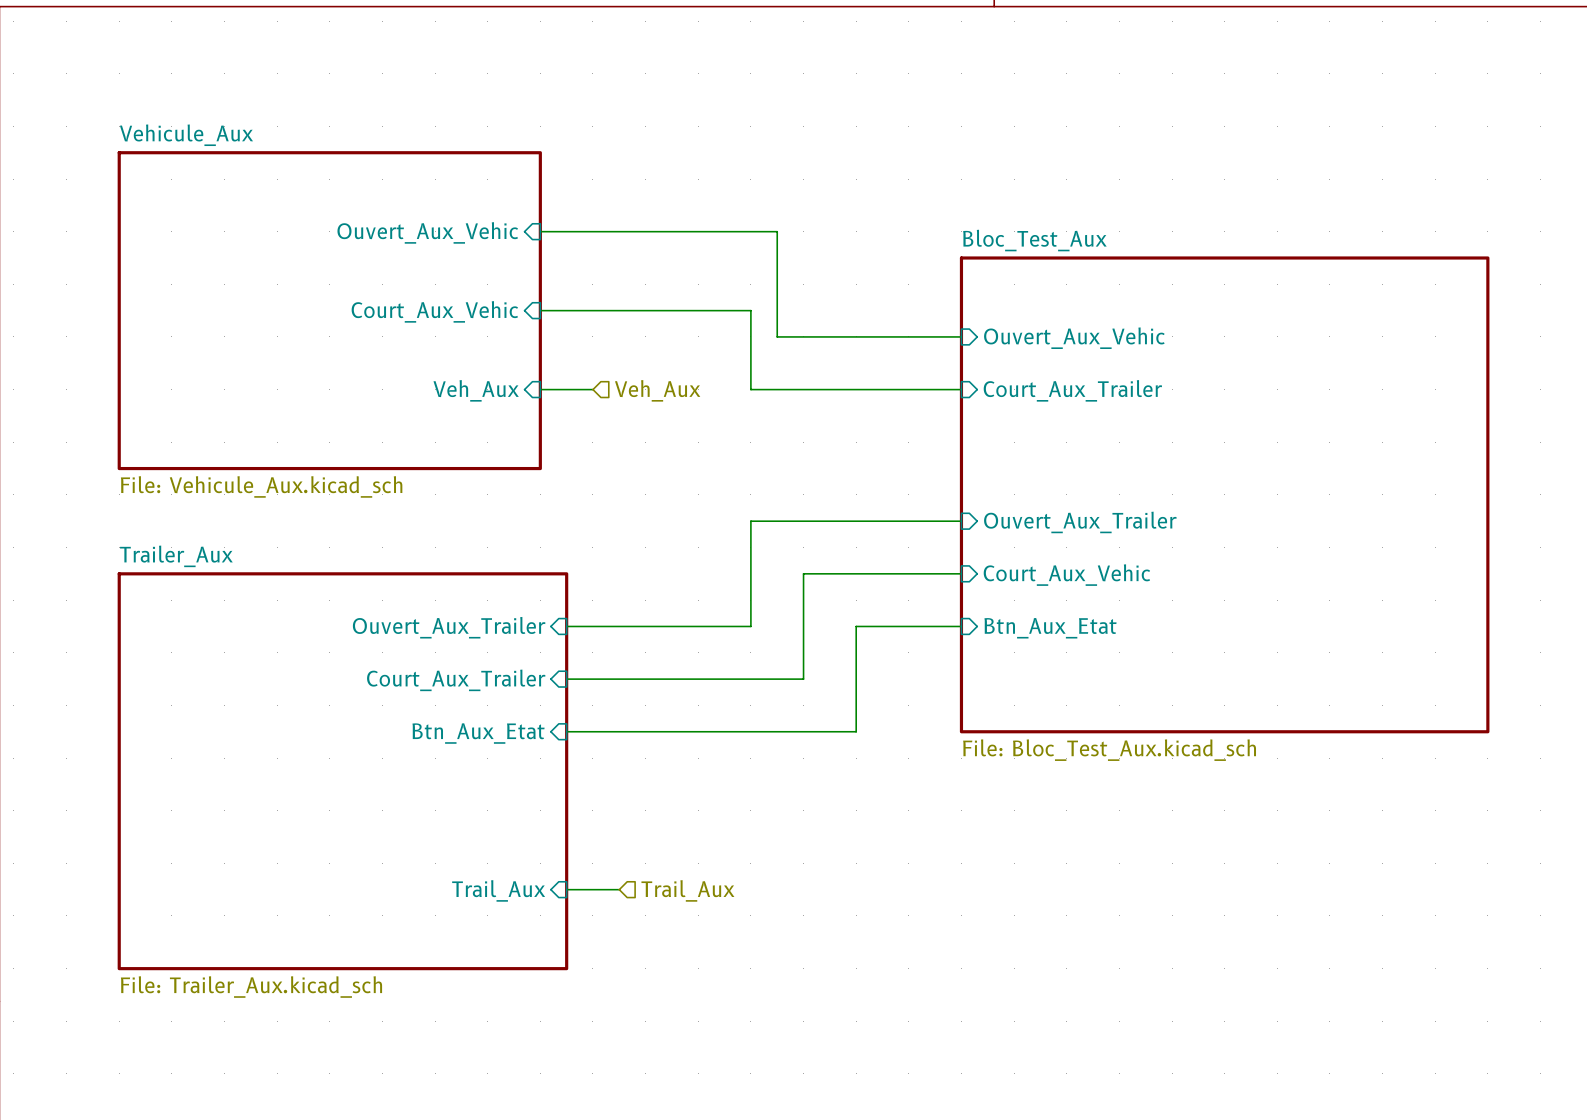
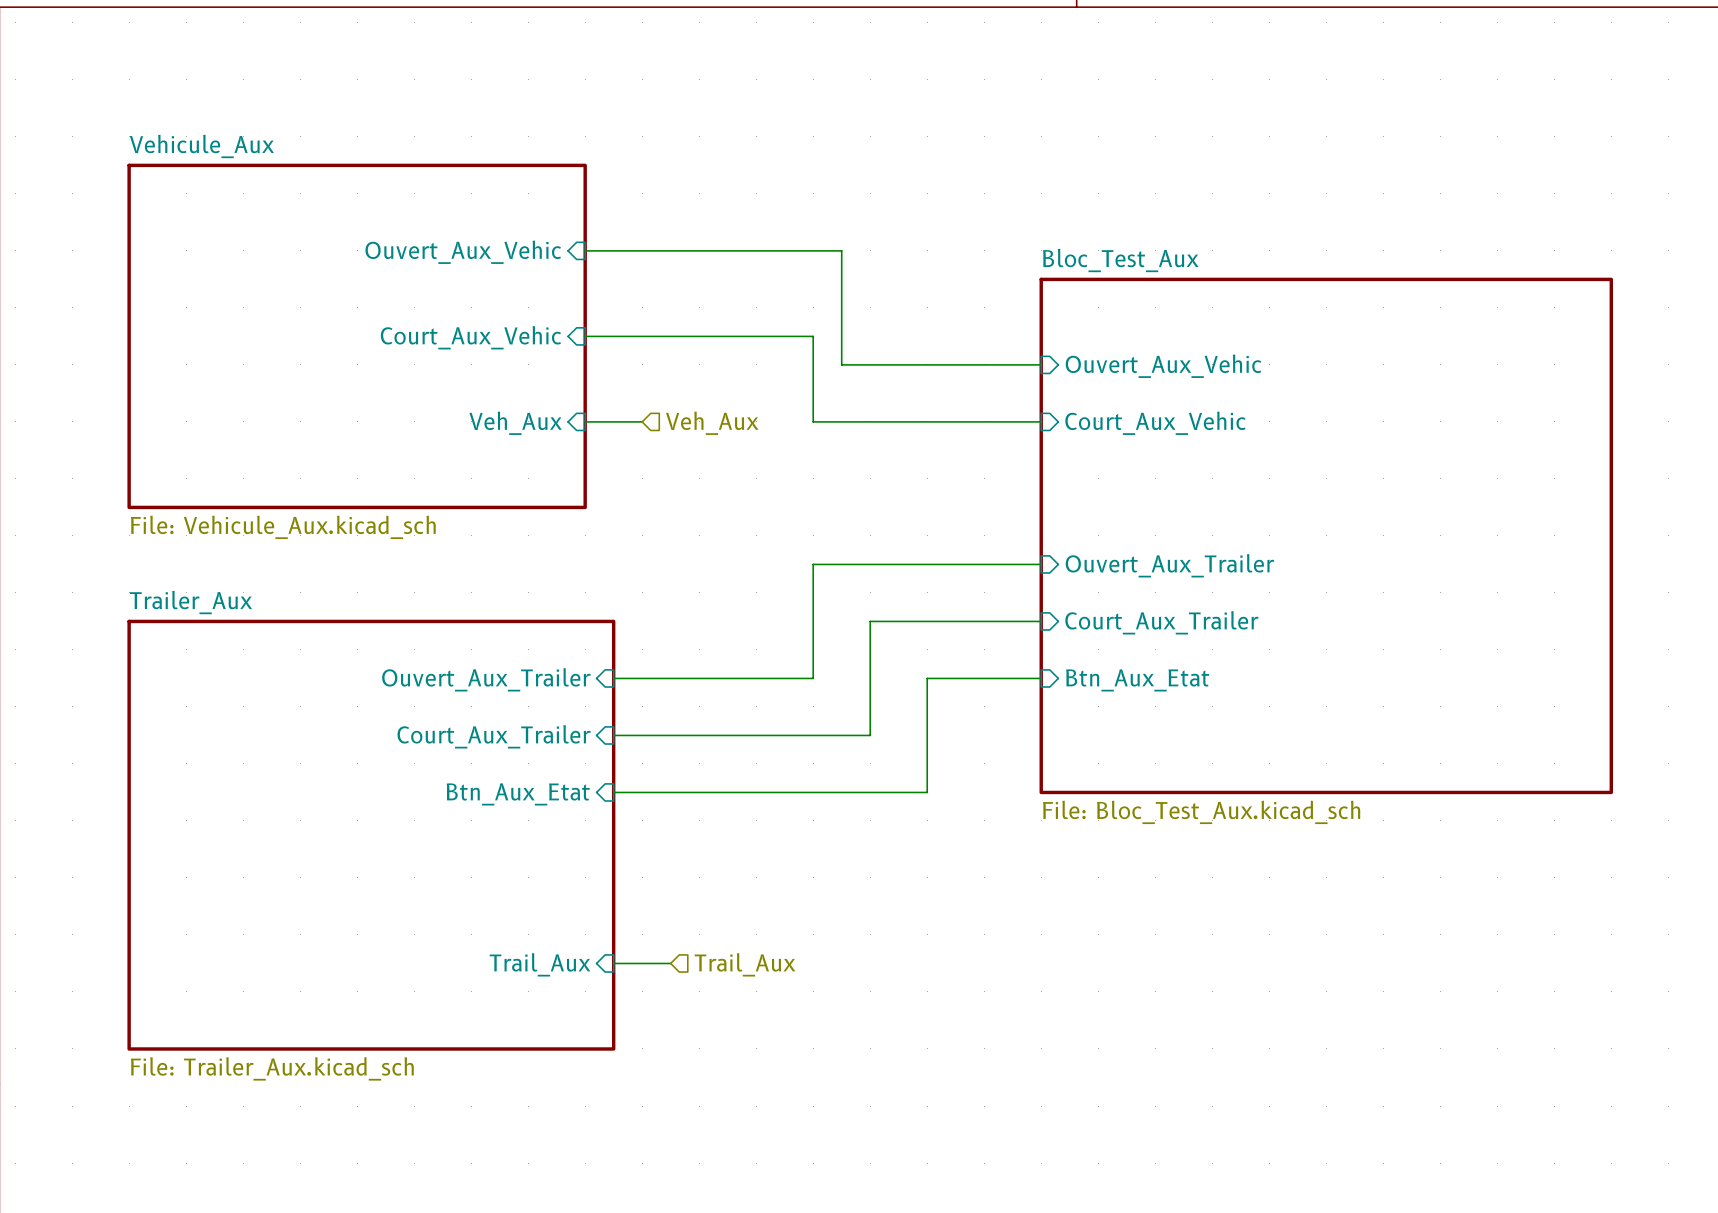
sheet pin: Court_Aux_Trailer (1072, 390) -> Court_Aux_Vehic (1155, 423)
sheet pin: Court_Aux_Vehic (1066, 575) -> Court_Aux_Trailer (1161, 622)

